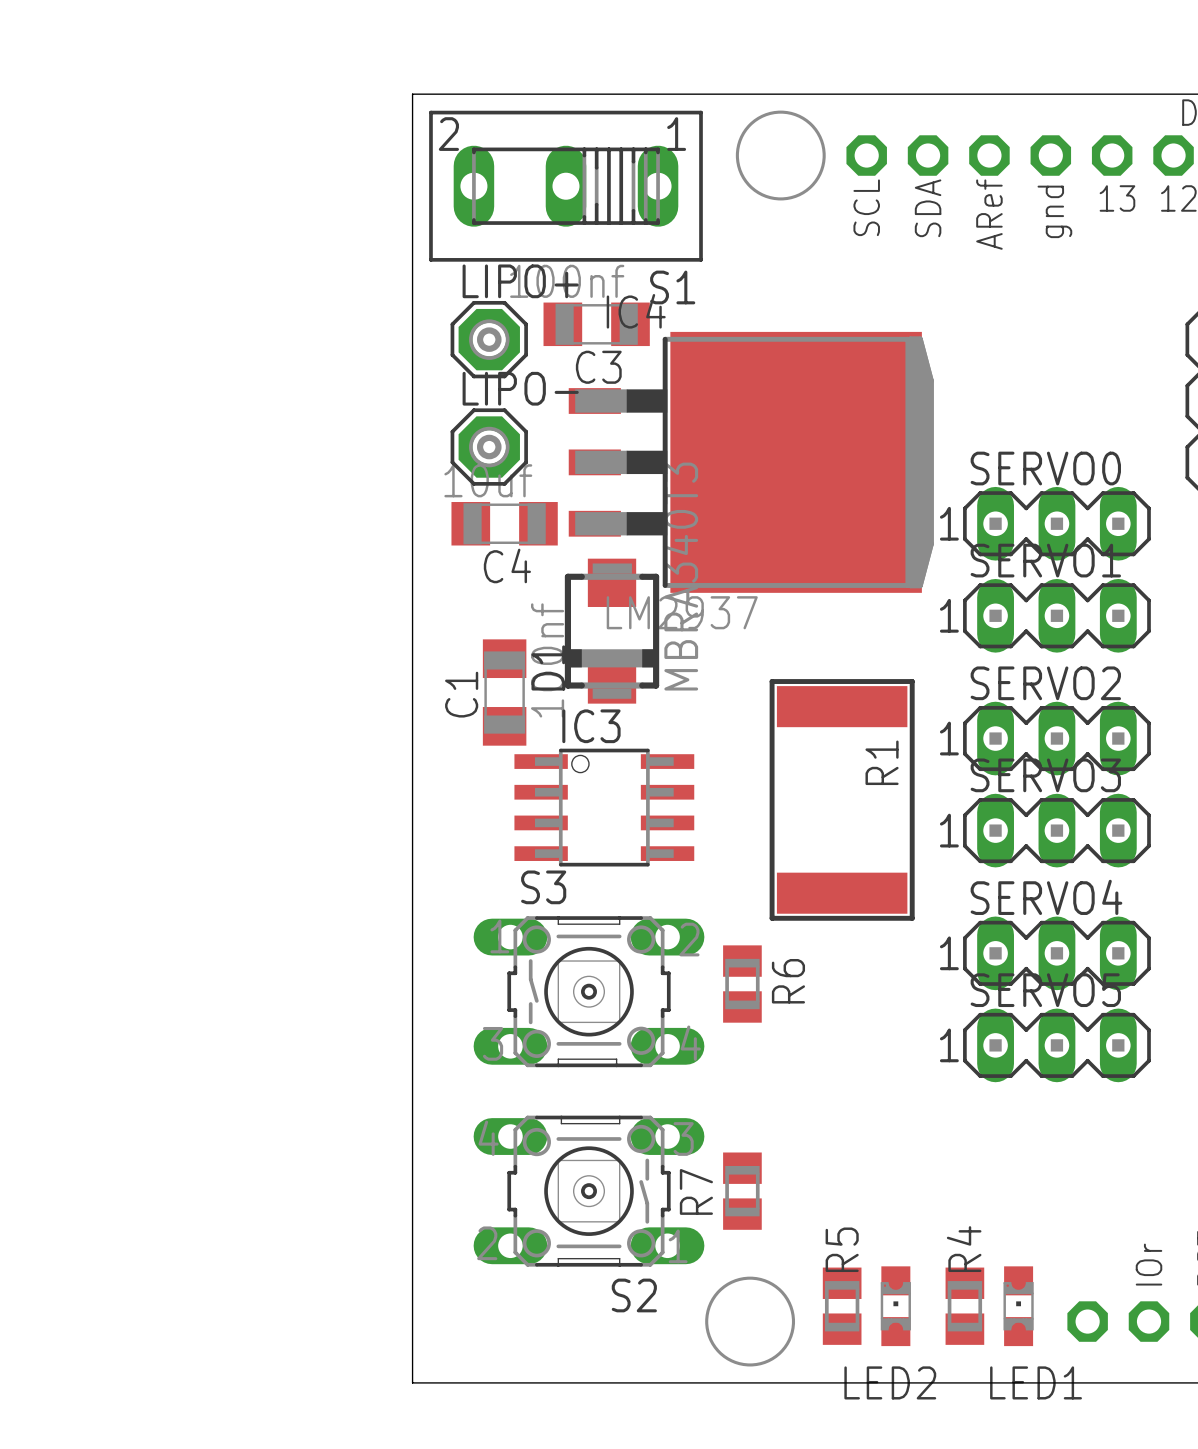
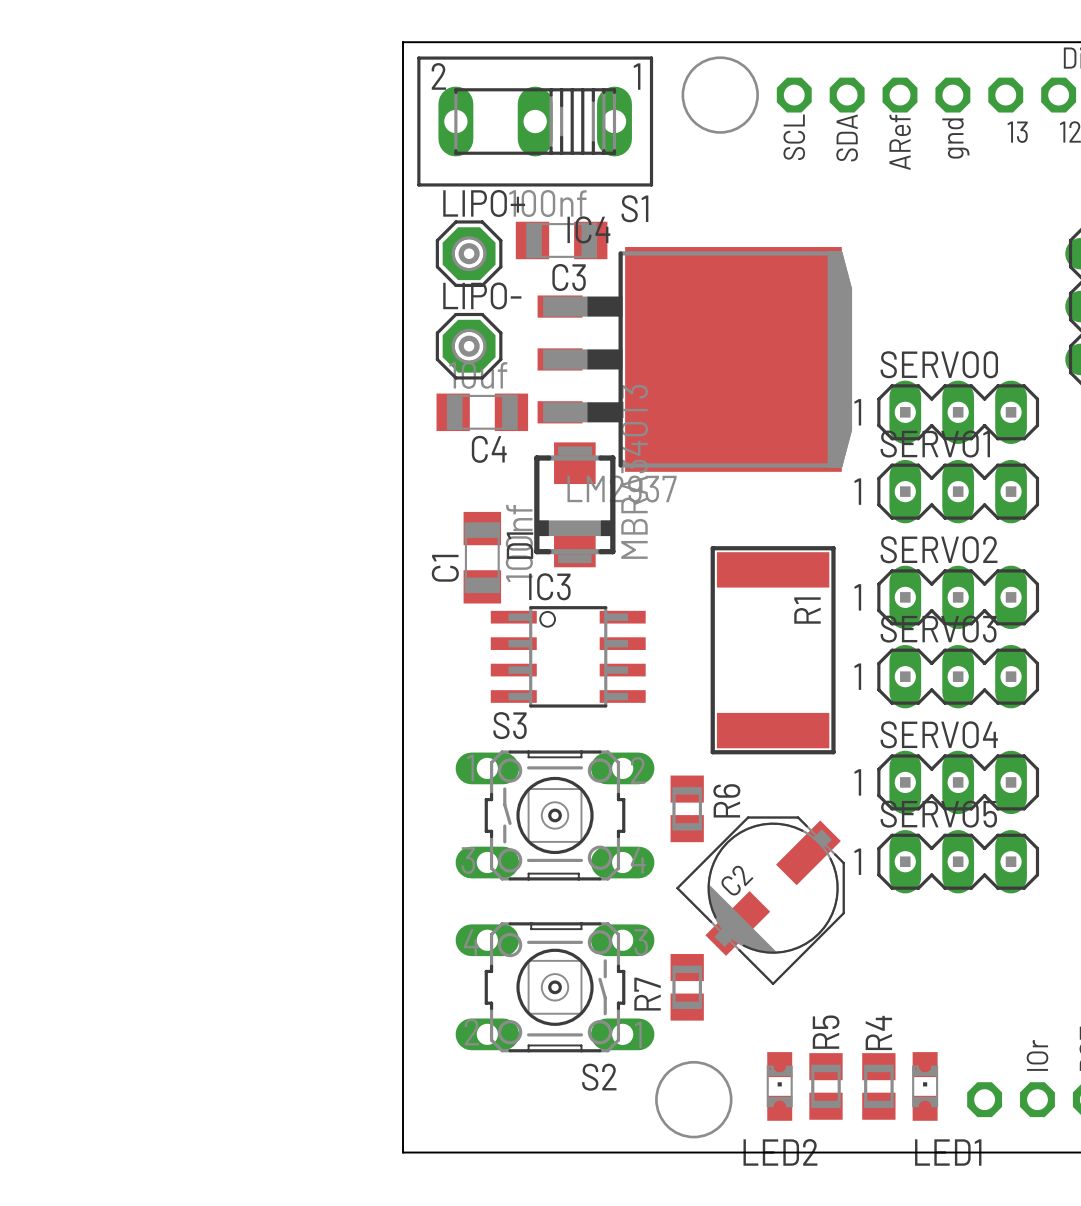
C2: none -> (760, 900)
R5 position: (842, 1306) -> (825, 1086)
LED2 position: (895, 1306) -> (779, 1086)

